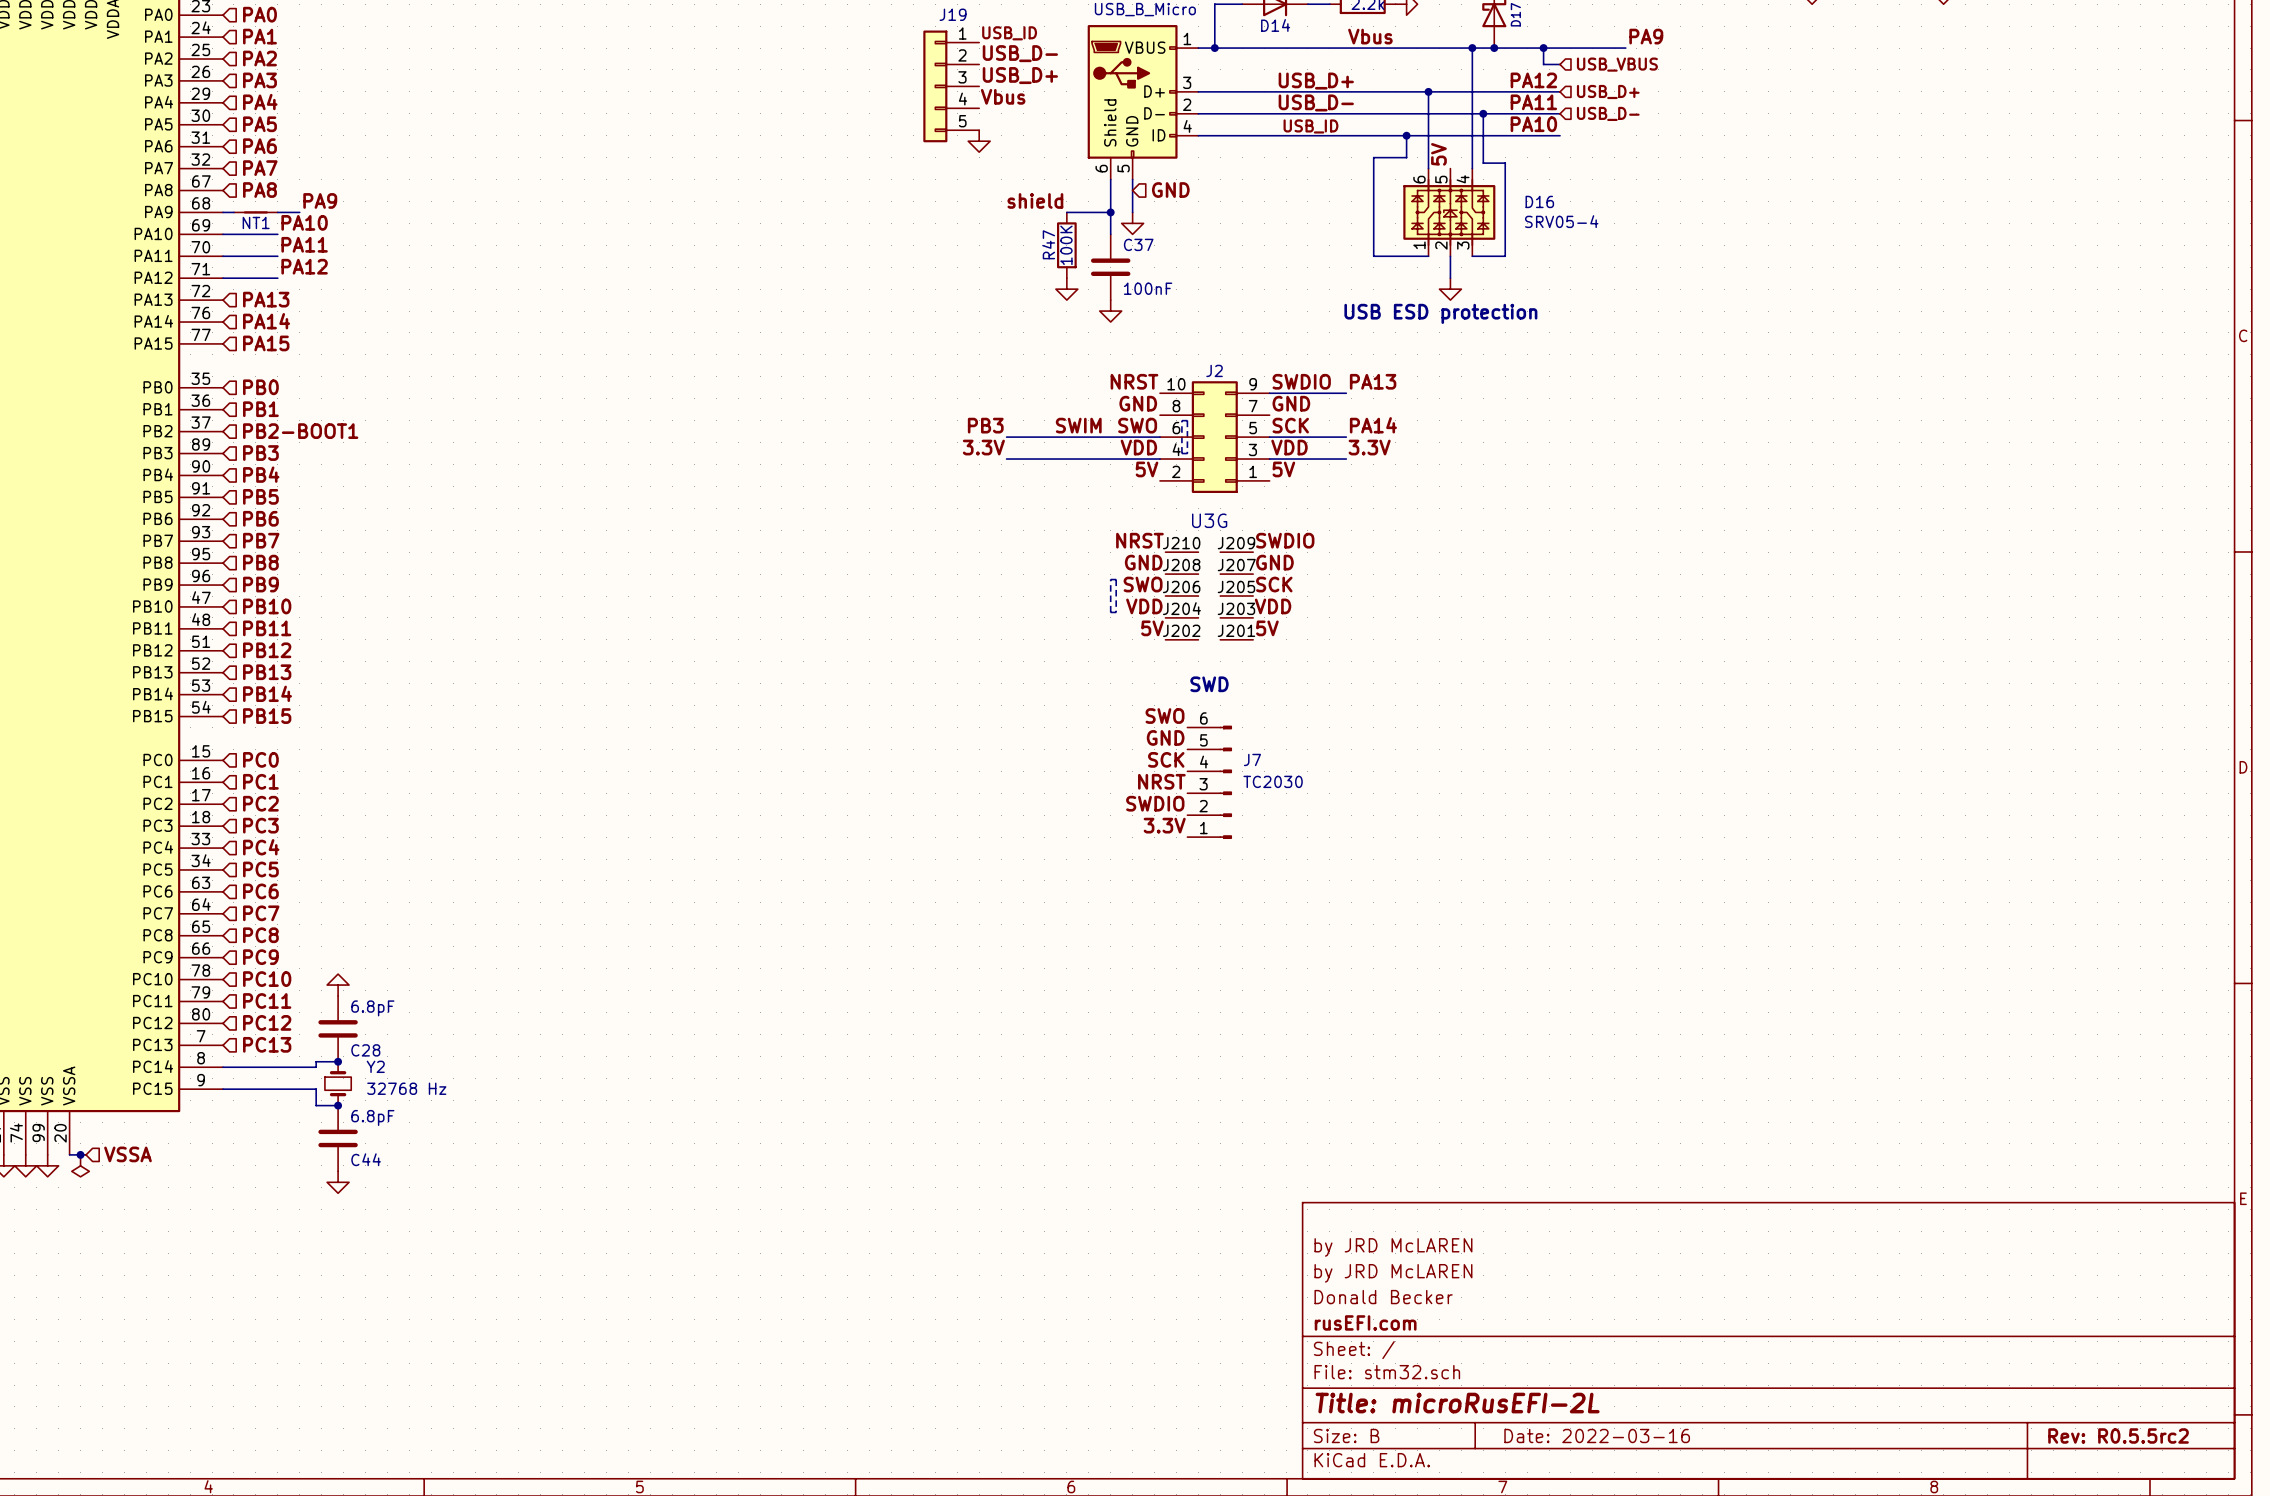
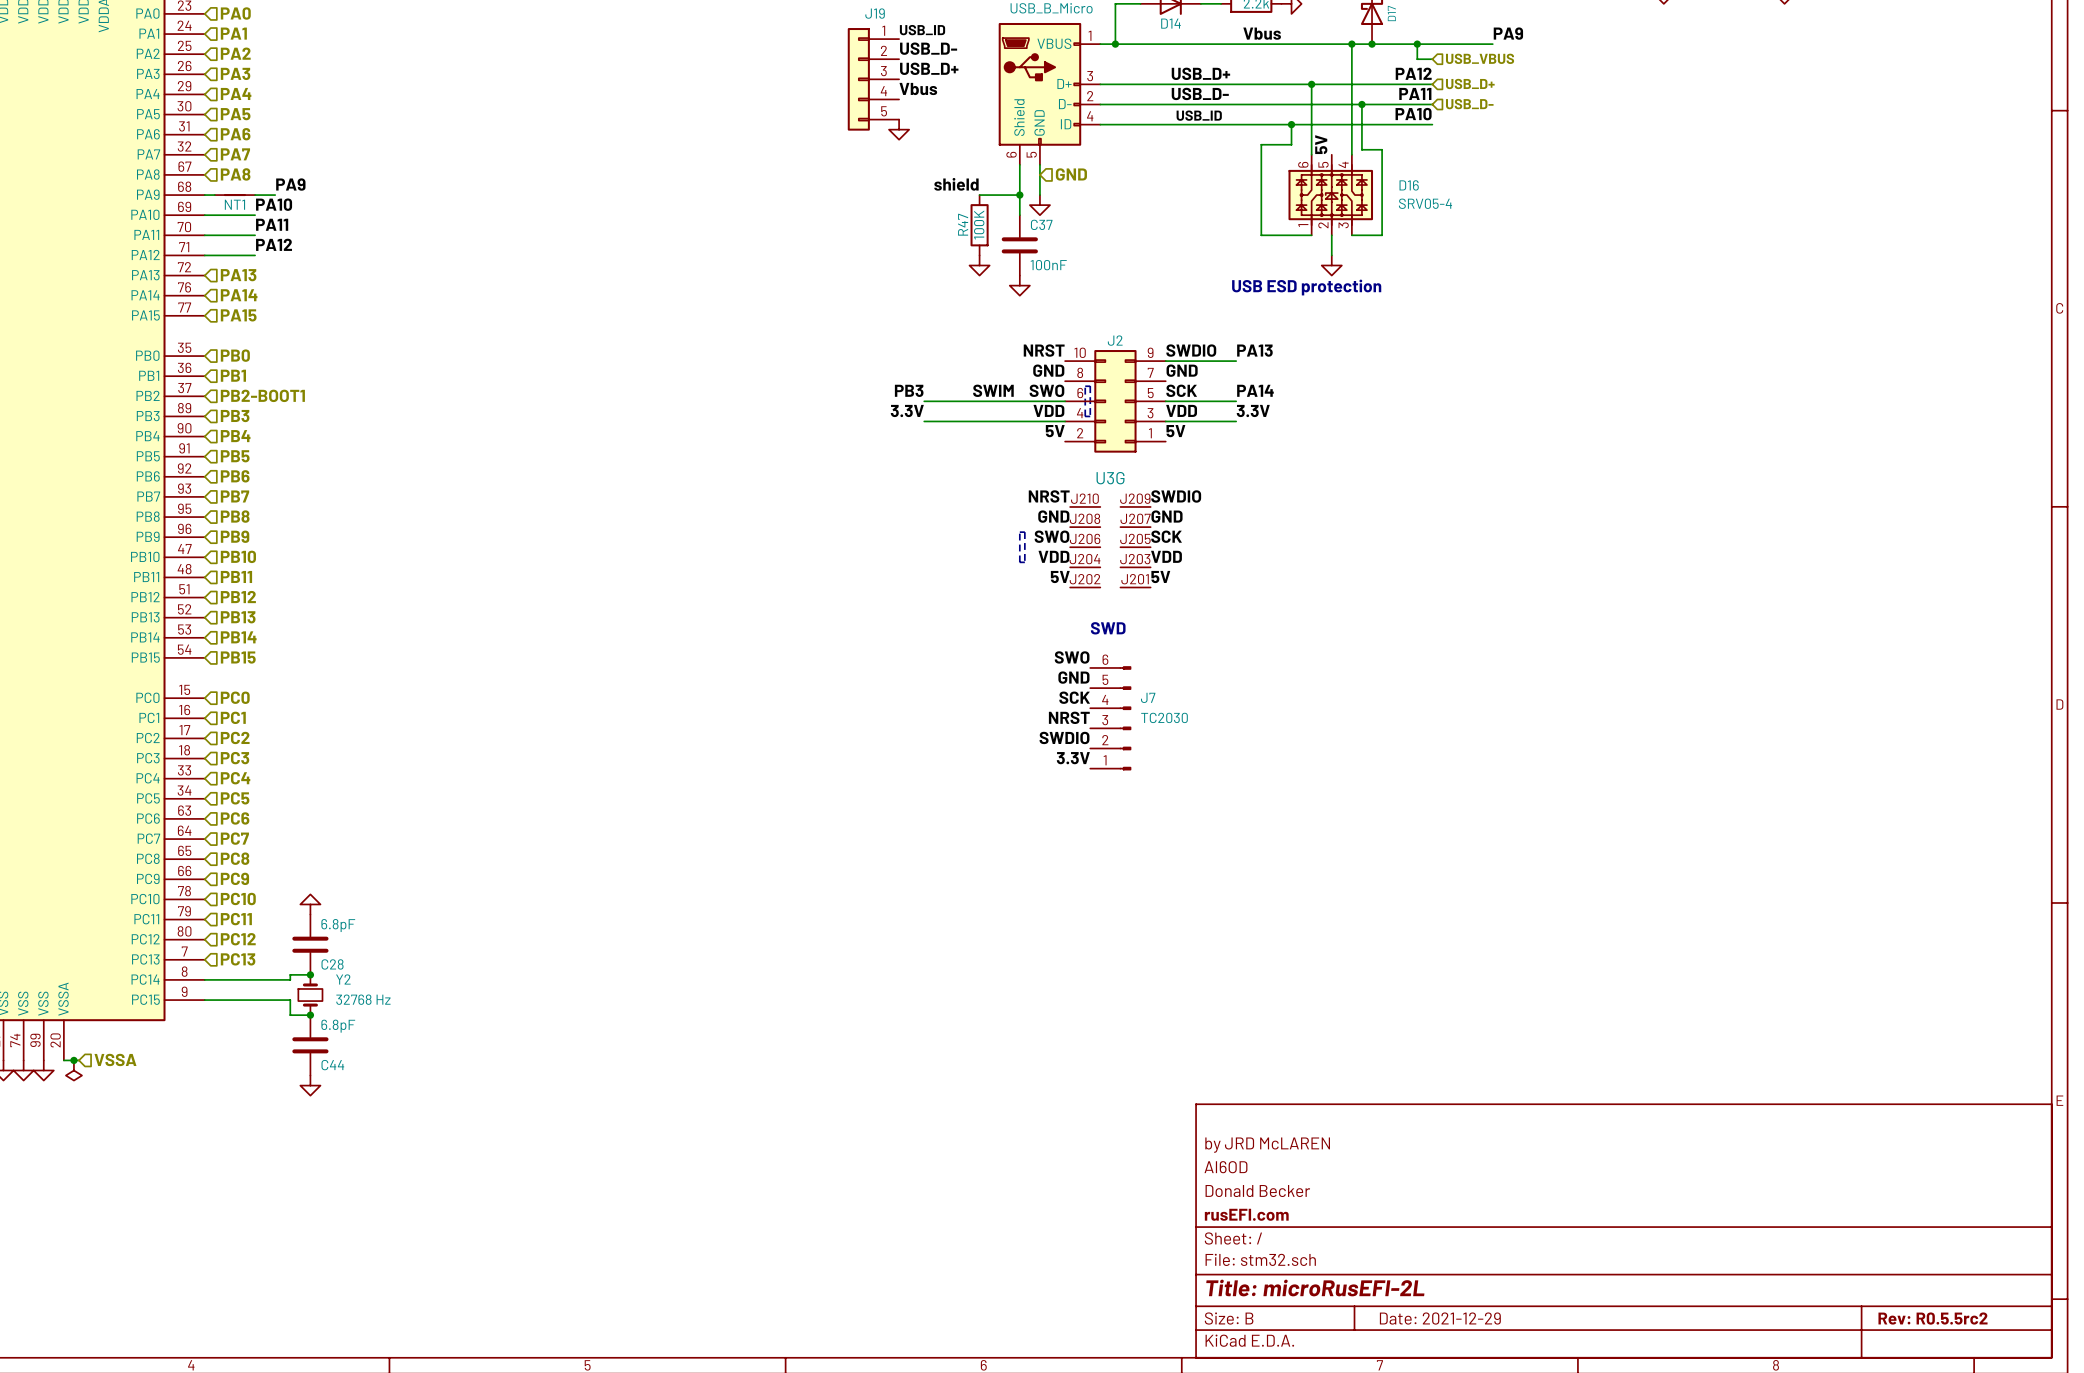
title block: by JRD McLAREN (1393, 1273) -> AI6OD (1225, 1167)
title block: Date: 2022-03-16 (1597, 1436) -> Date: 2021-12-29 (1440, 1318)

